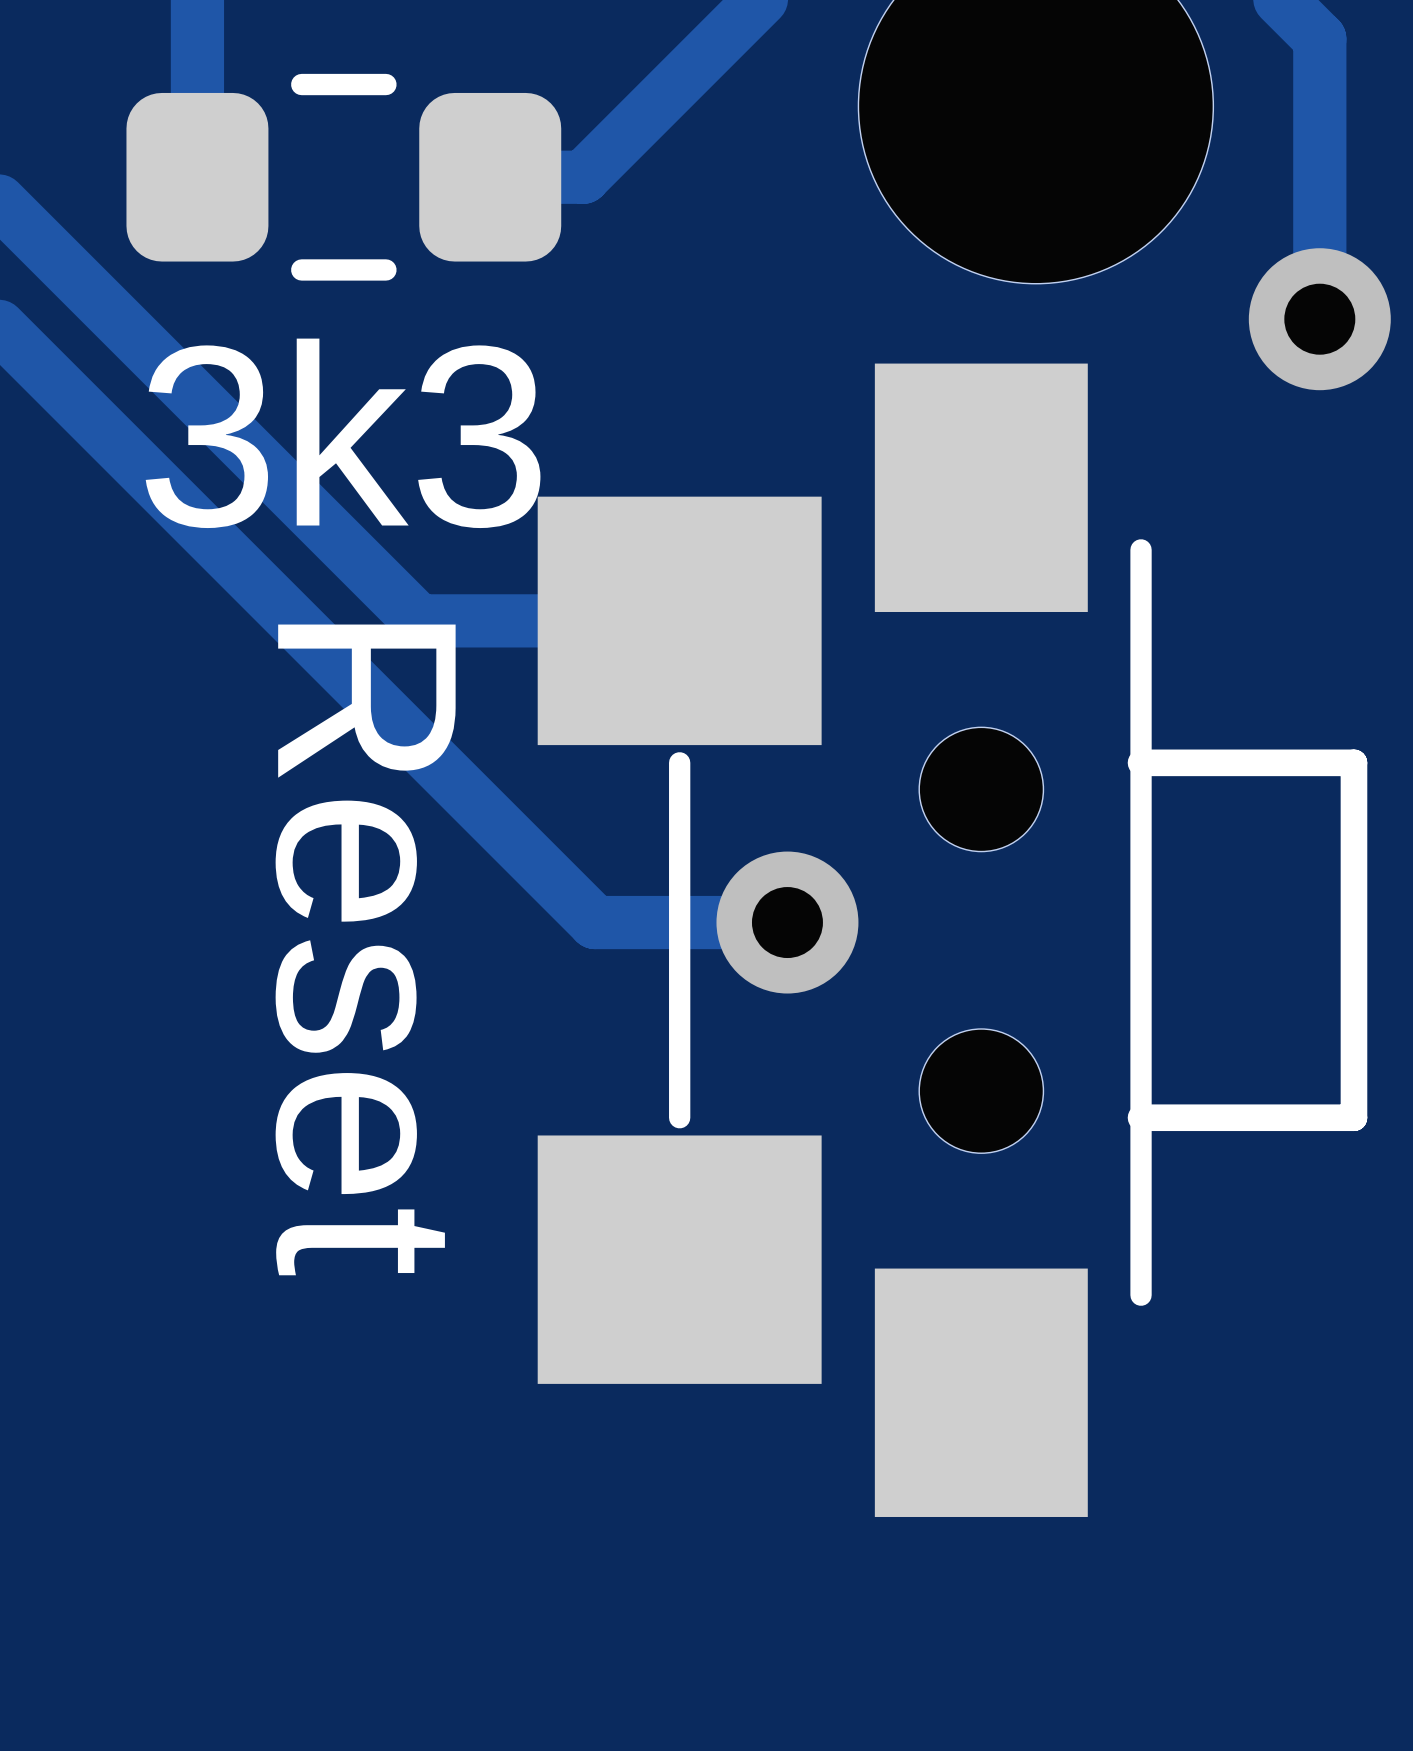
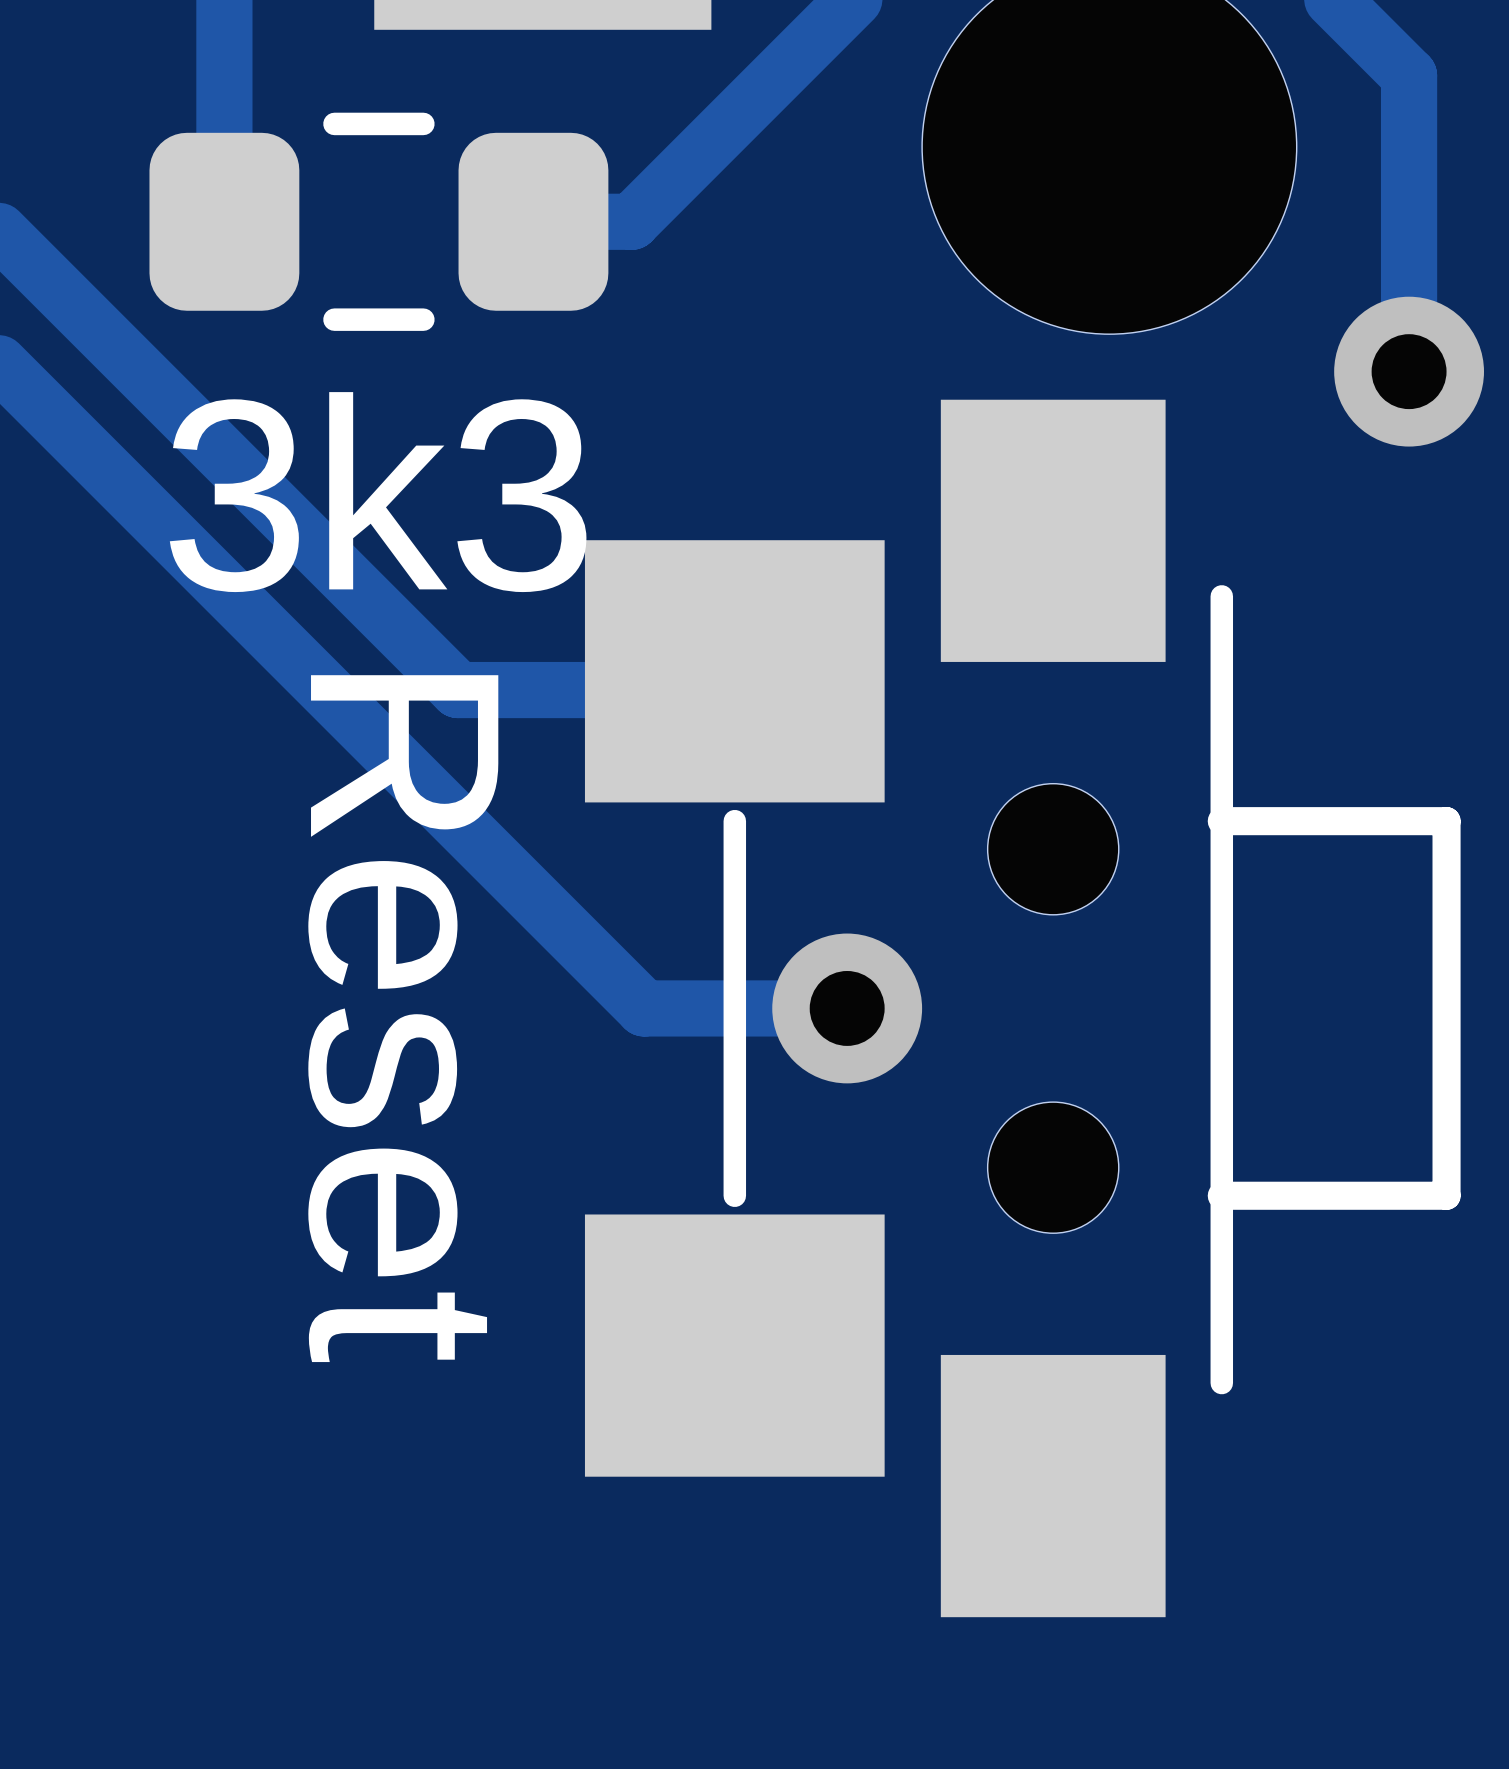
part position: (952, 940) -> (1022, 1008)

